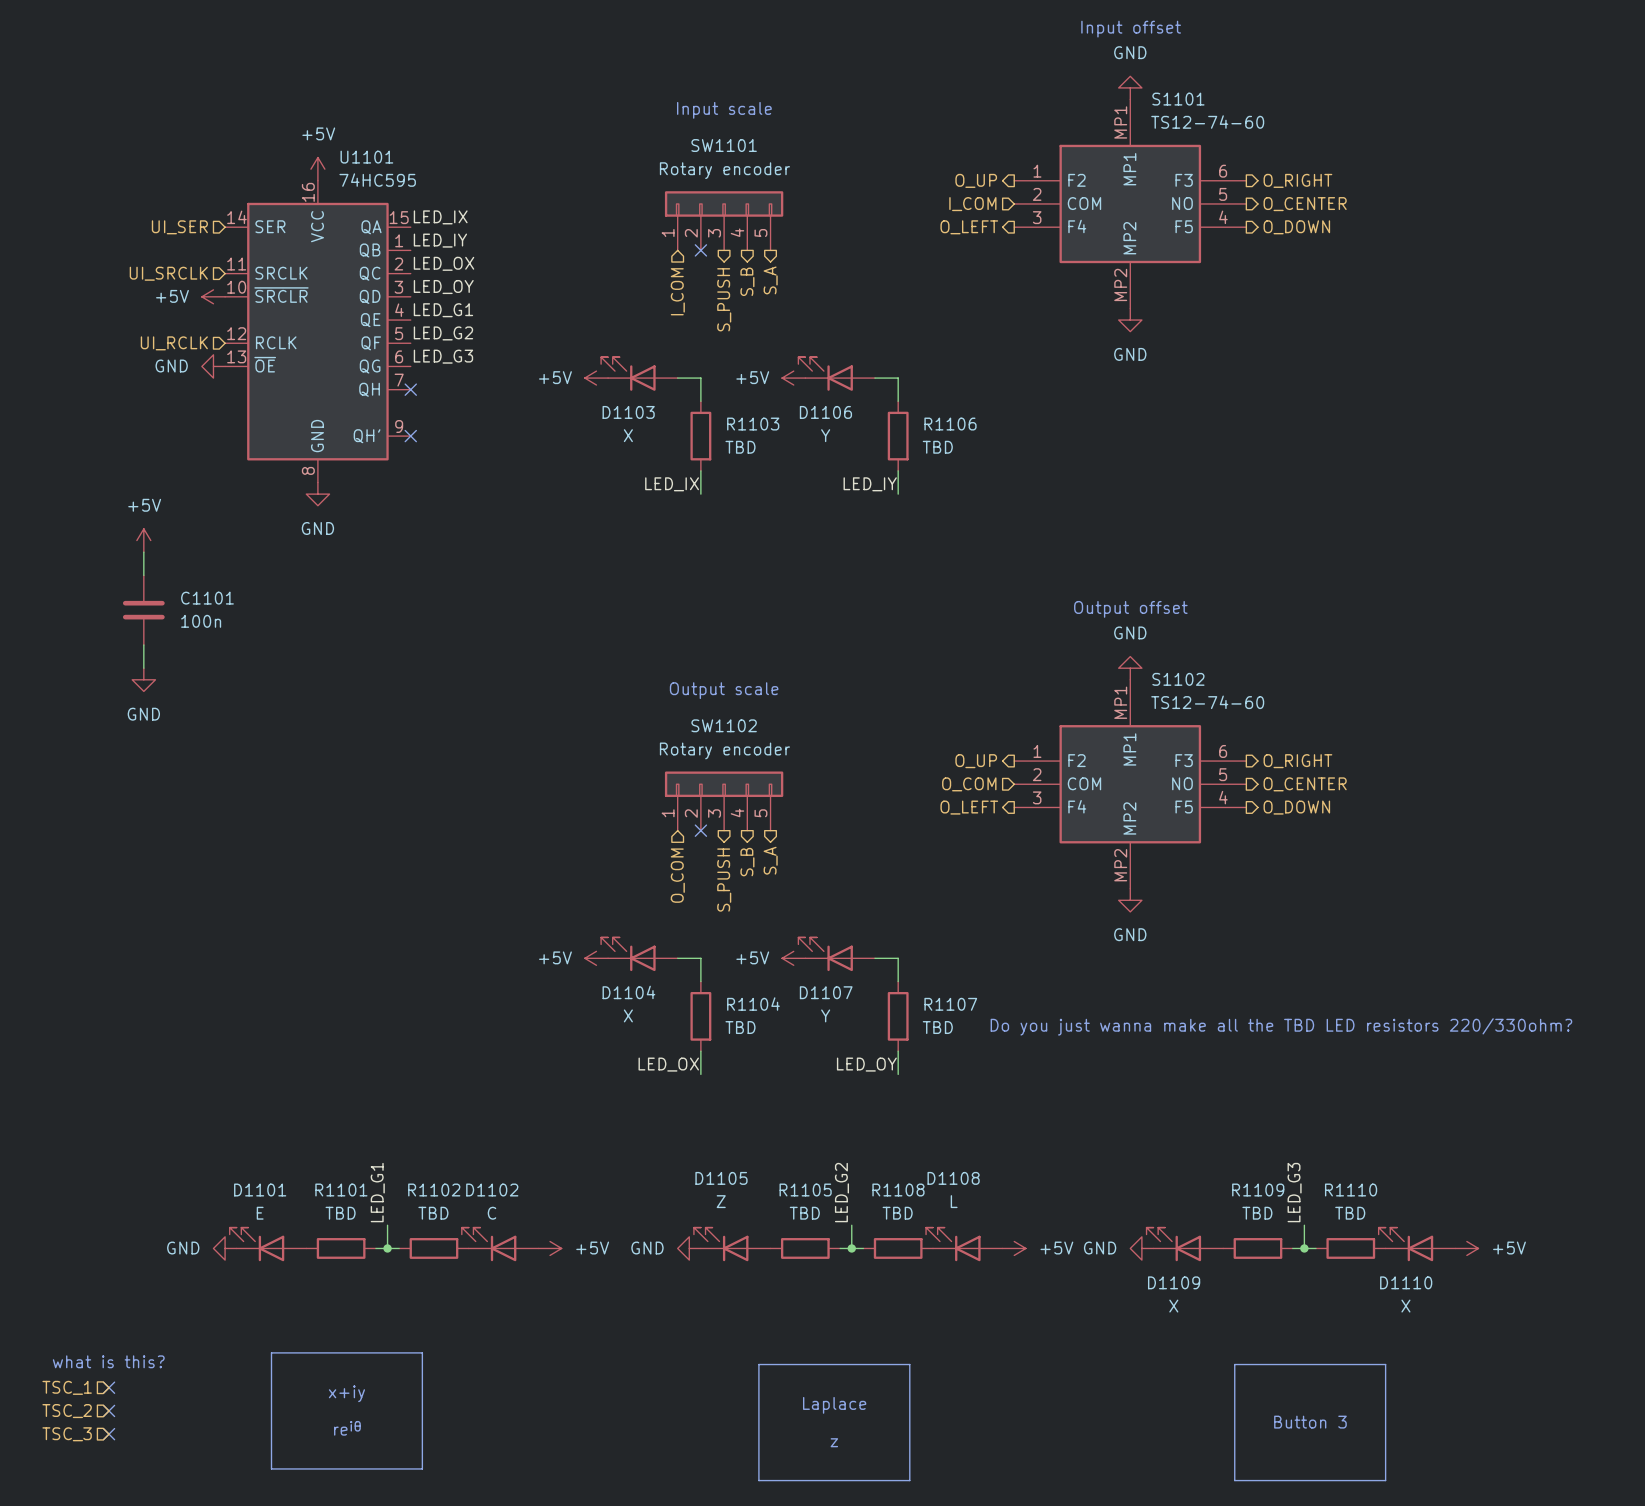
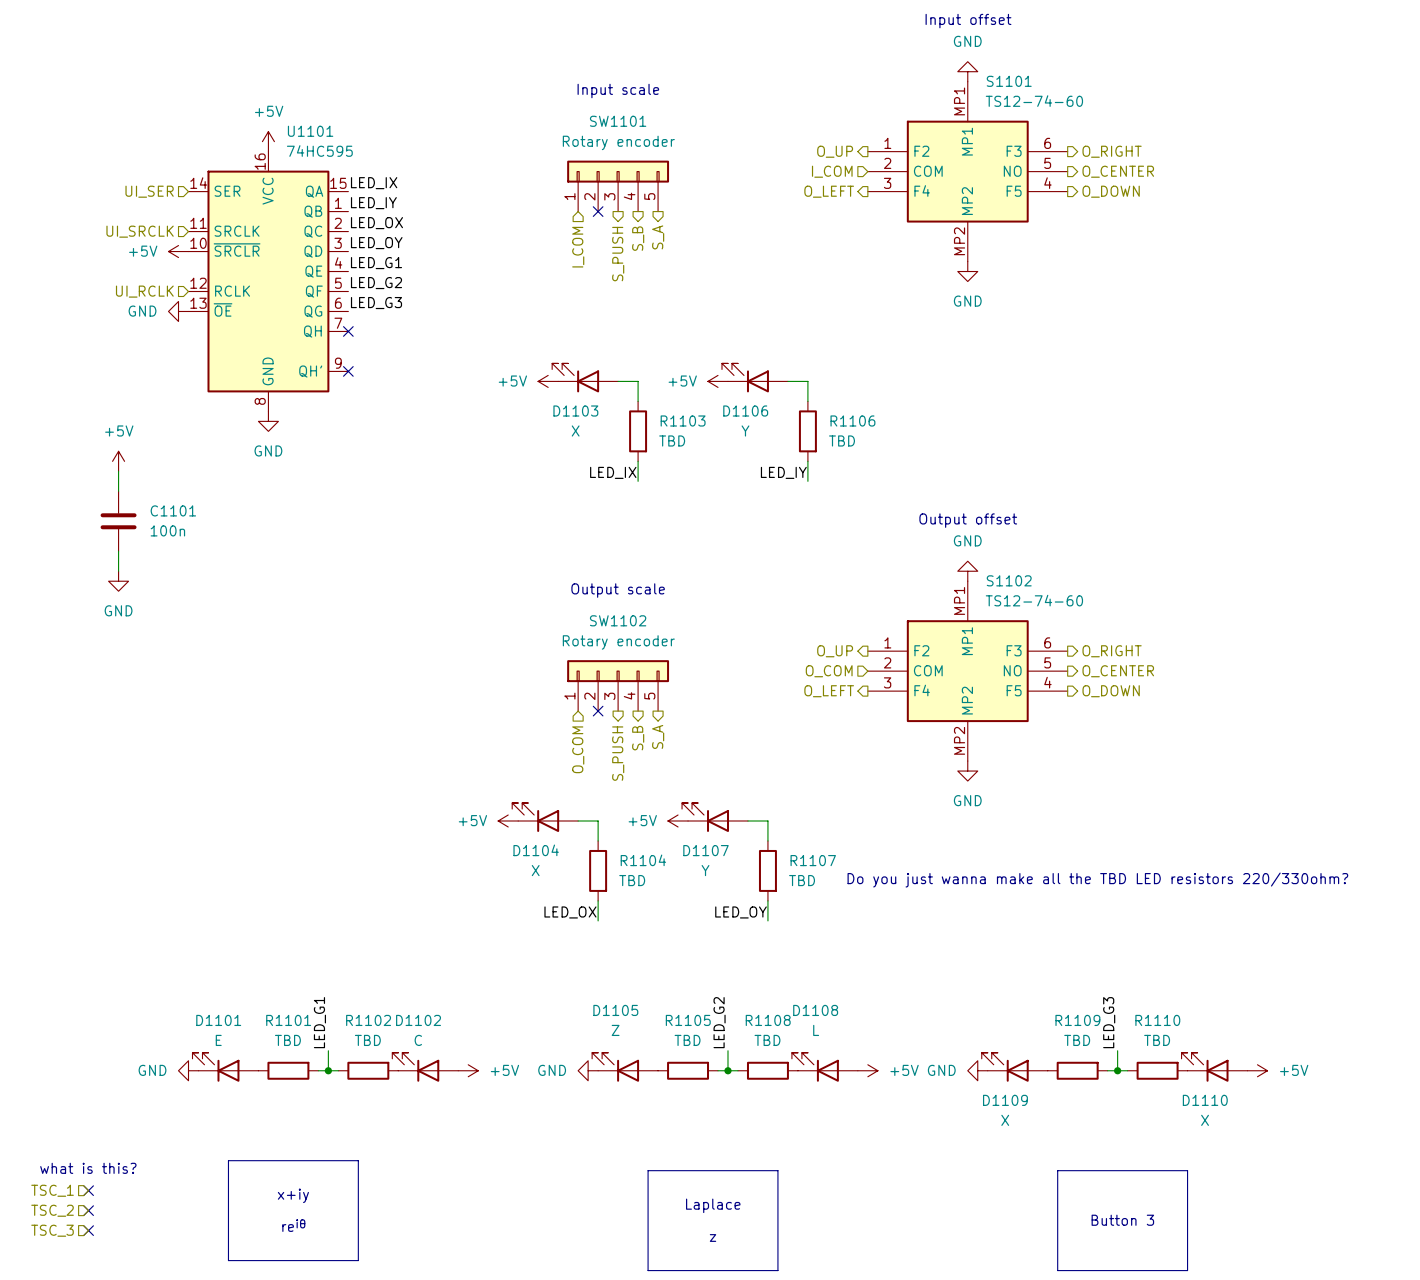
D1103 position: (639, 374) -> (585, 377)
D1106 position: (836, 374) -> (754, 377)
power symbol: +5V (596, 378) -> none
wire: (677, 378) (700, 378) (700, 401) -> (618, 381) (638, 381) (638, 401)
power symbol: +5V (793, 378) -> none
wire: (874, 378) (898, 378) (898, 401) -> (787, 381) (807, 381) (807, 401)
R1103 position: (700, 436) -> (638, 431)
R1106 position: (898, 436) -> (807, 431)
power symbol: none -> +5V (548, 381)
power symbol: none -> +5V (718, 381)
wire: (700, 470) (700, 494) -> (638, 461) (638, 481)
wire: (898, 470) (898, 494) -> (807, 461) (807, 481)
label position: LED_IX (672, 484) -> LED_IX (613, 472)
label position: LED_IY (870, 484) -> LED_IY (783, 472)

